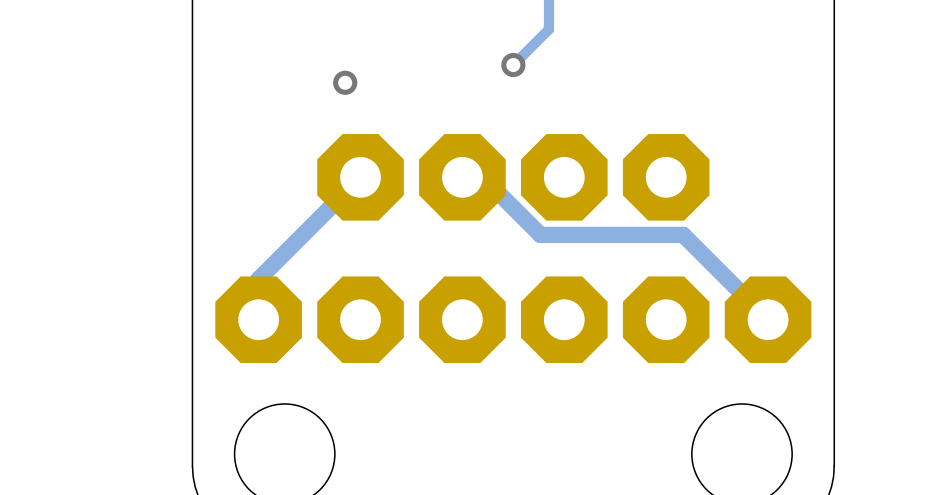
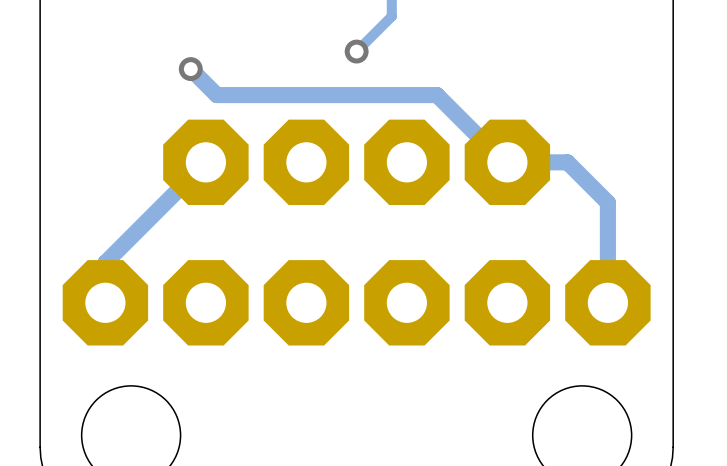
track: (462, 177) (482, 177) (540, 234) (683, 234) (768, 319) -> (190, 69) (216, 95) (436, 95) (504, 162) (567, 162) (607, 202) (607, 302)

